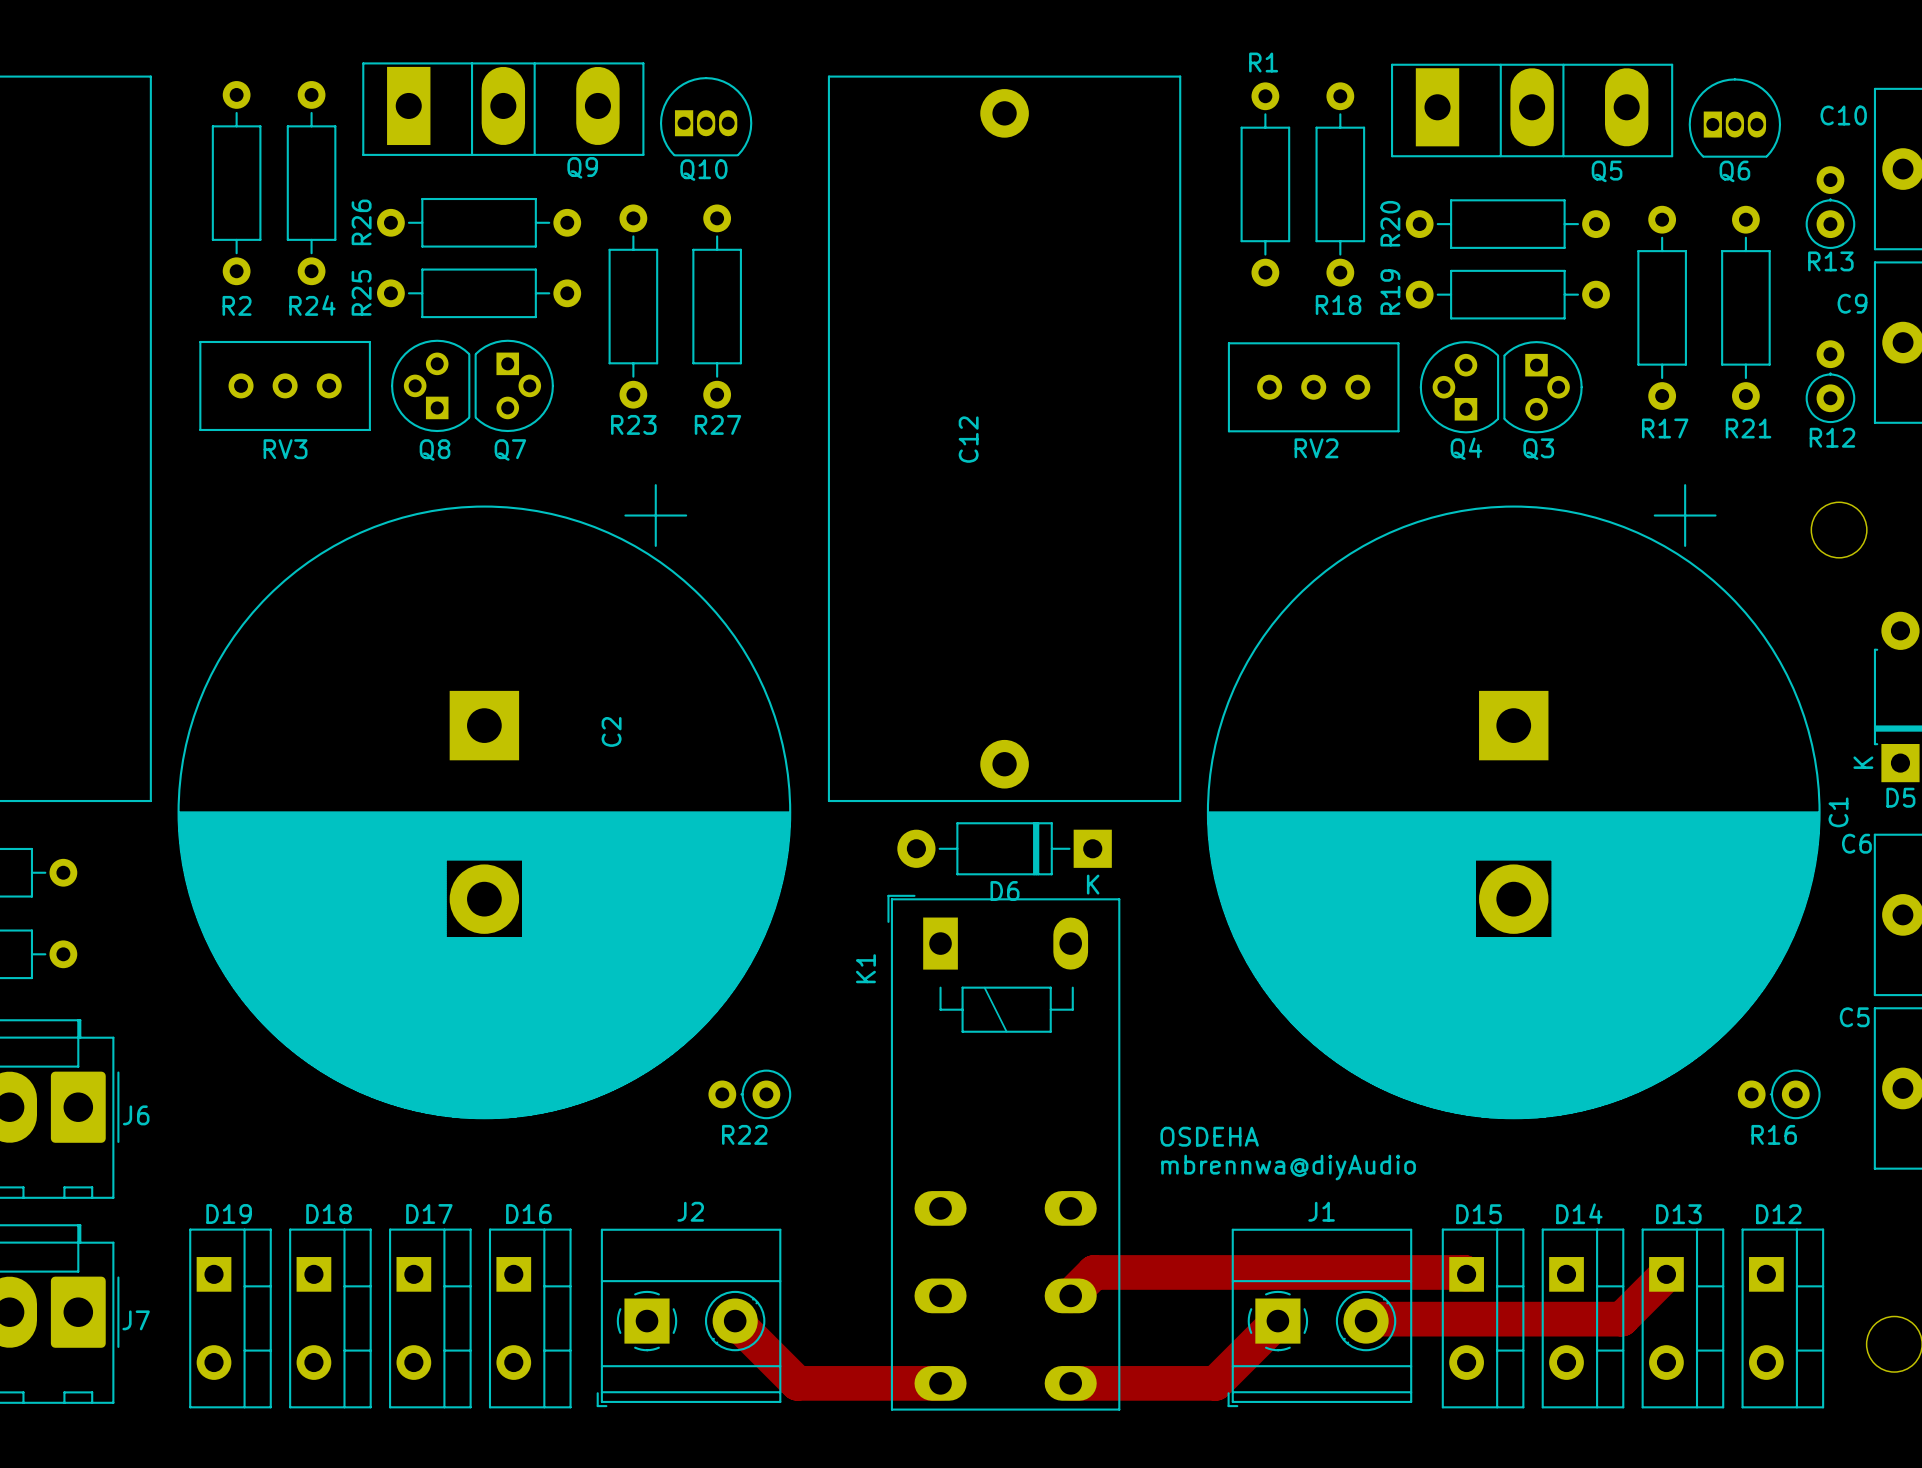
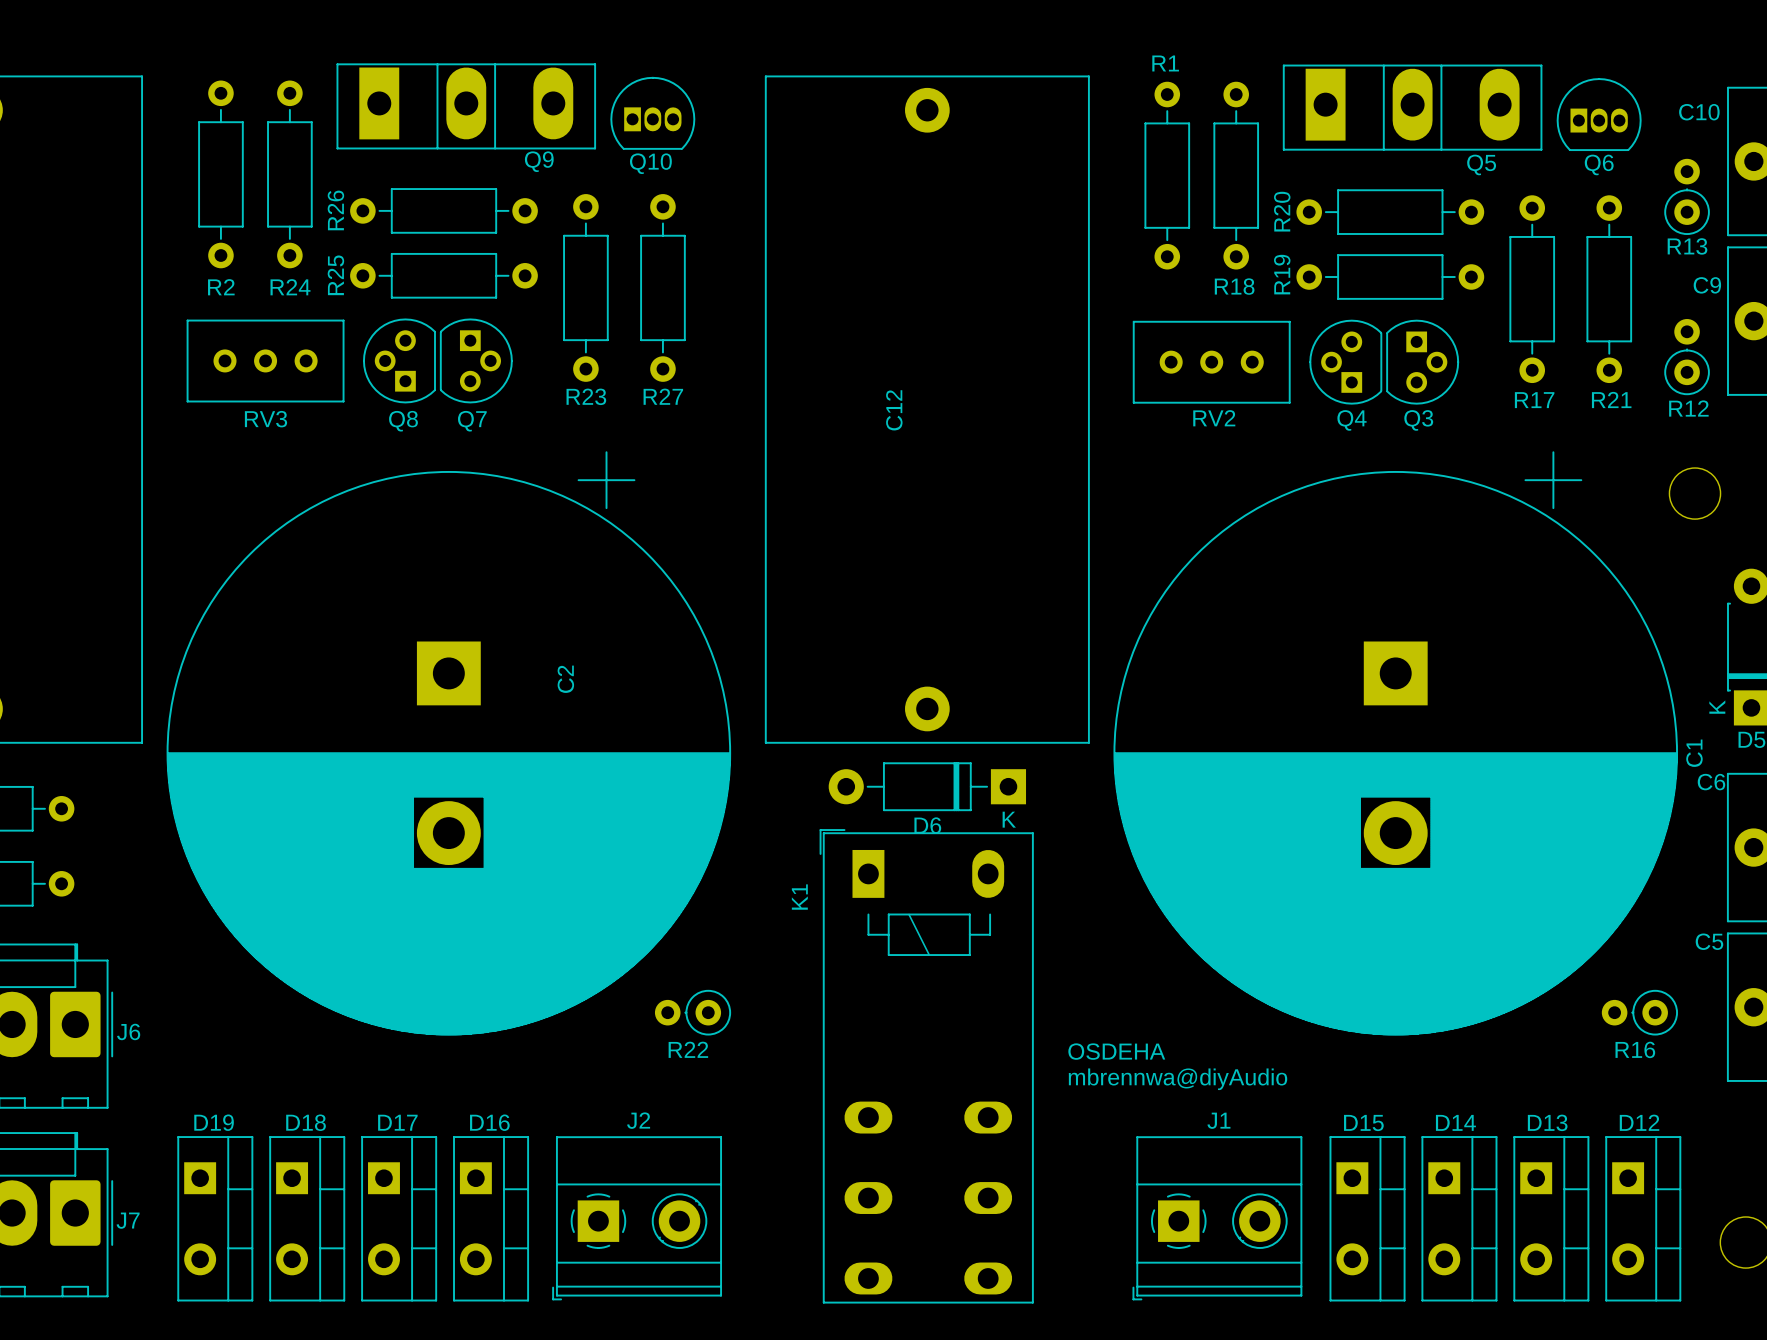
top track: (1466, 1274) (1464, 1272) (1094, 1272) (1070, 1295) -> none
top track: (1666, 1274) (1621, 1319) (1367, 1319) (1366, 1321) -> none
top track: (735, 1321) (797, 1383) (940, 1383) -> none
top track: (1277, 1321) (1215, 1383) (1070, 1383) -> none

